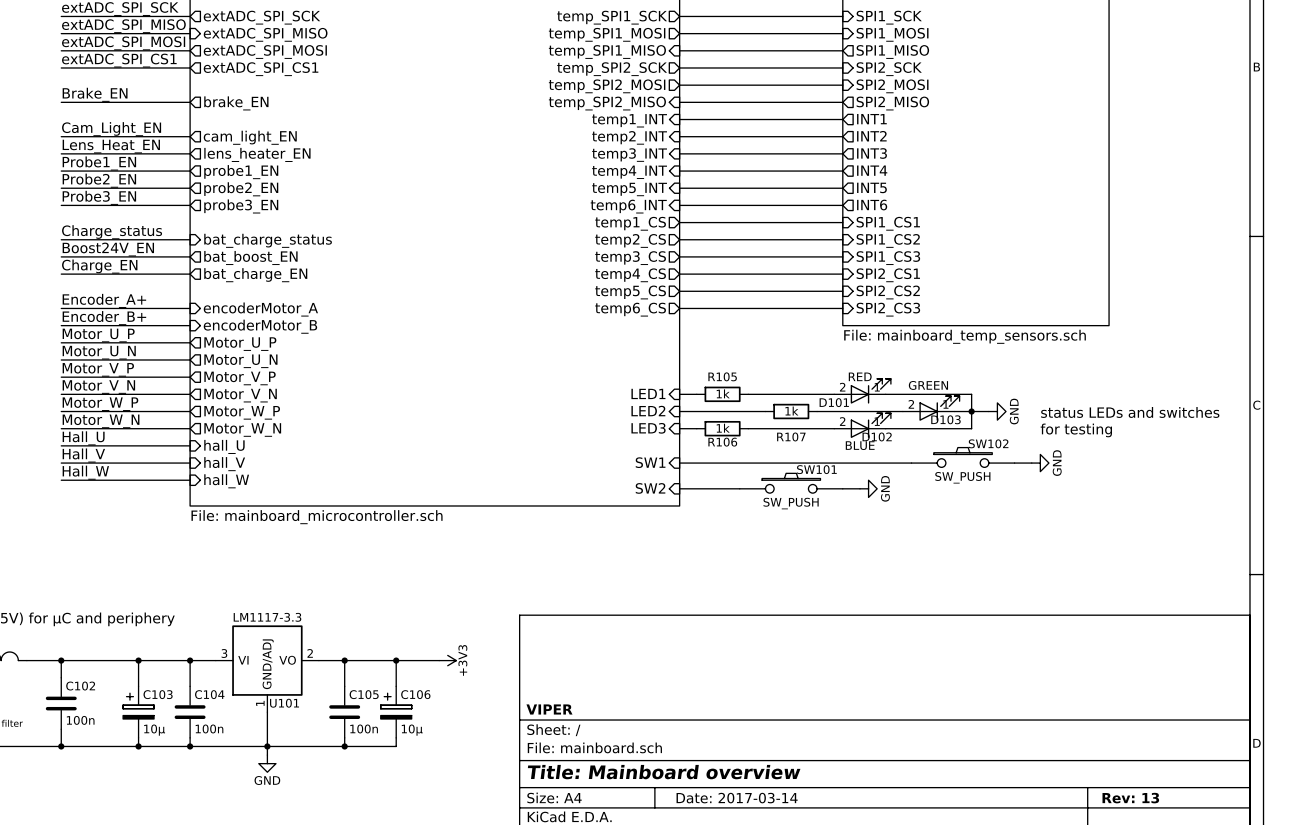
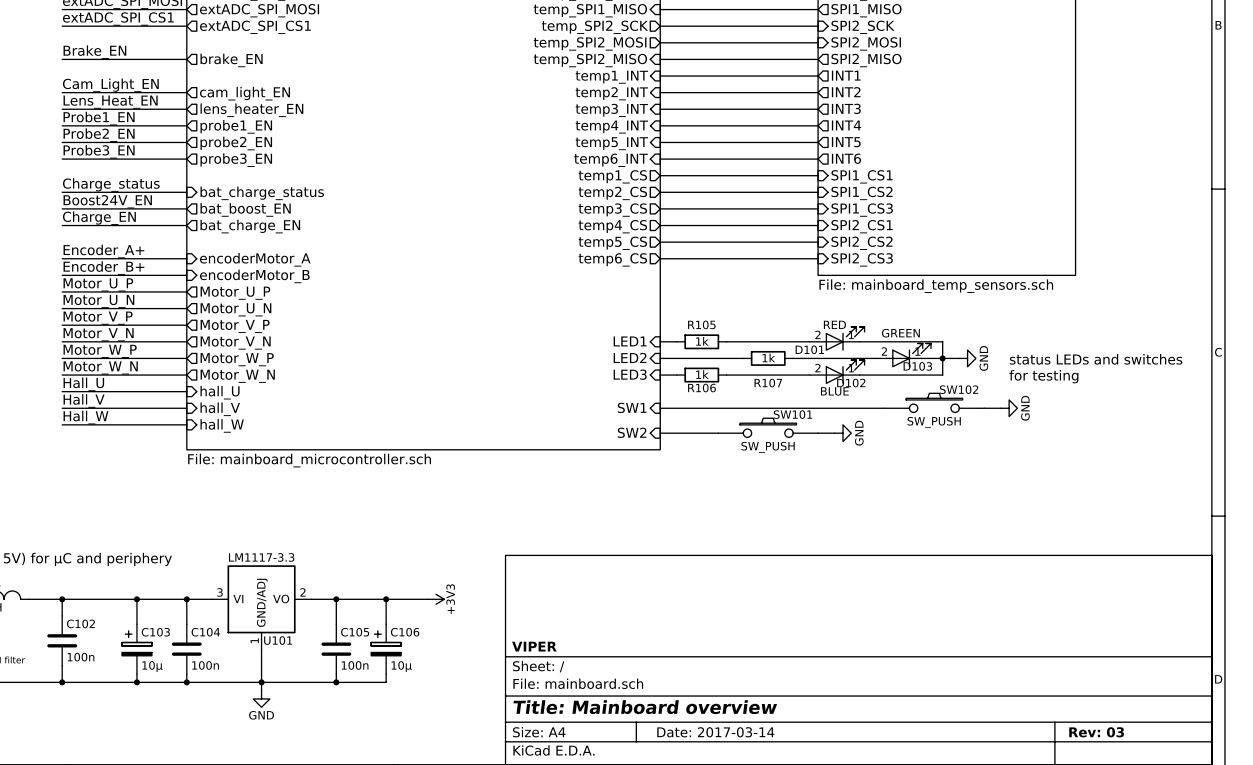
title block: Rev: 13 (1130, 798) -> Rev: 03 (1096, 732)

